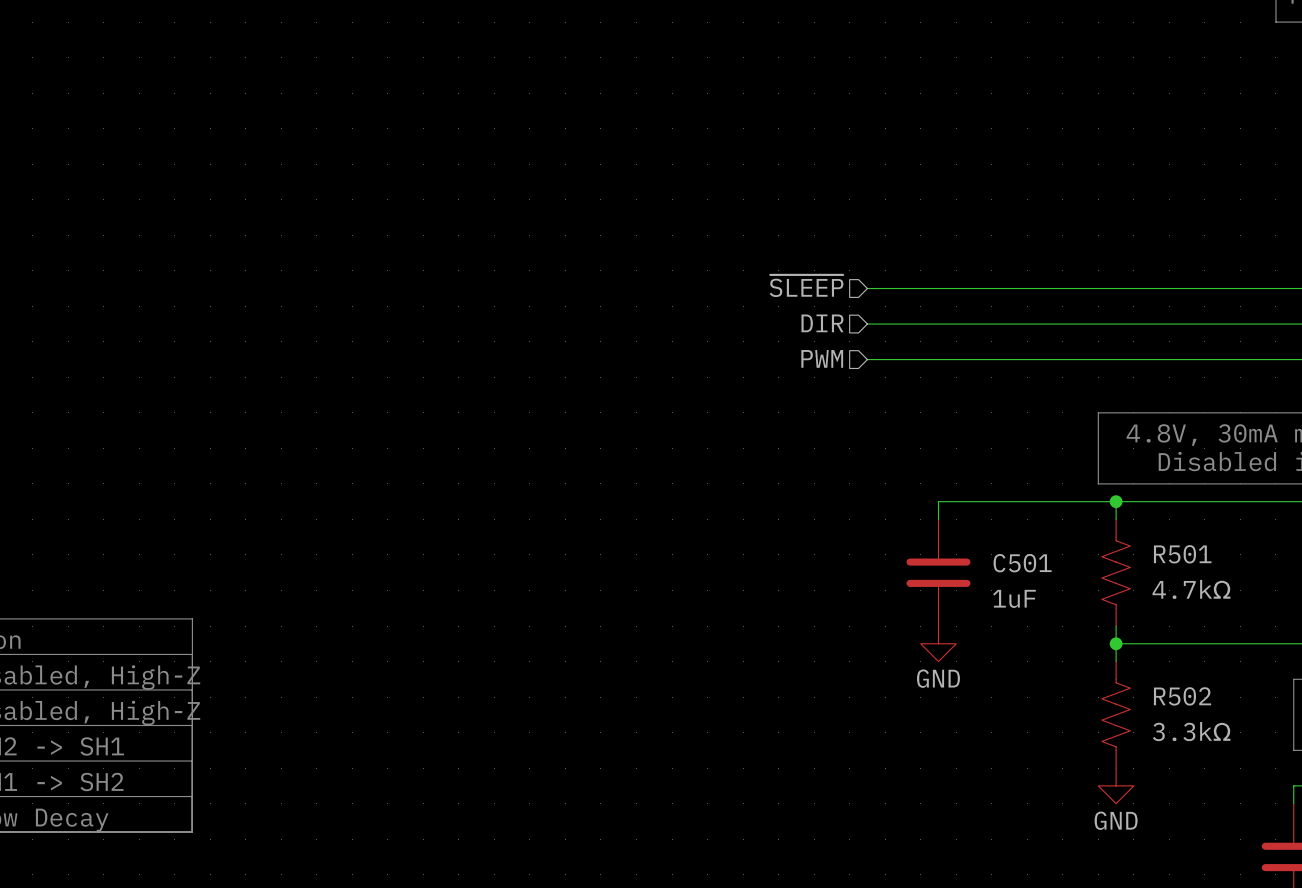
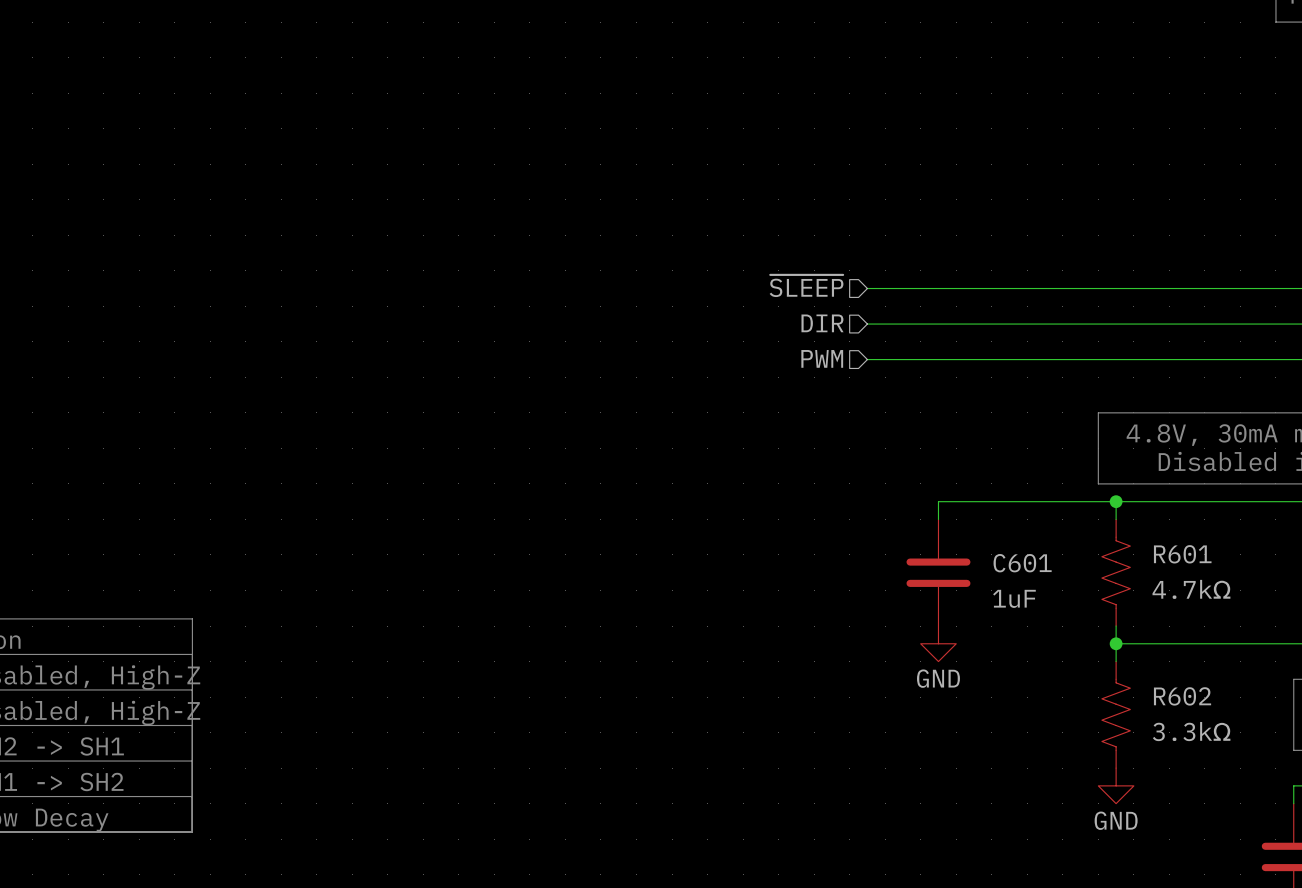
R501 name: R501 (1182, 554) -> R601 (1182, 554)
C501 name: C501 (1022, 563) -> C601 (1022, 563)
R502 name: R502 (1182, 696) -> R602 (1182, 696)

